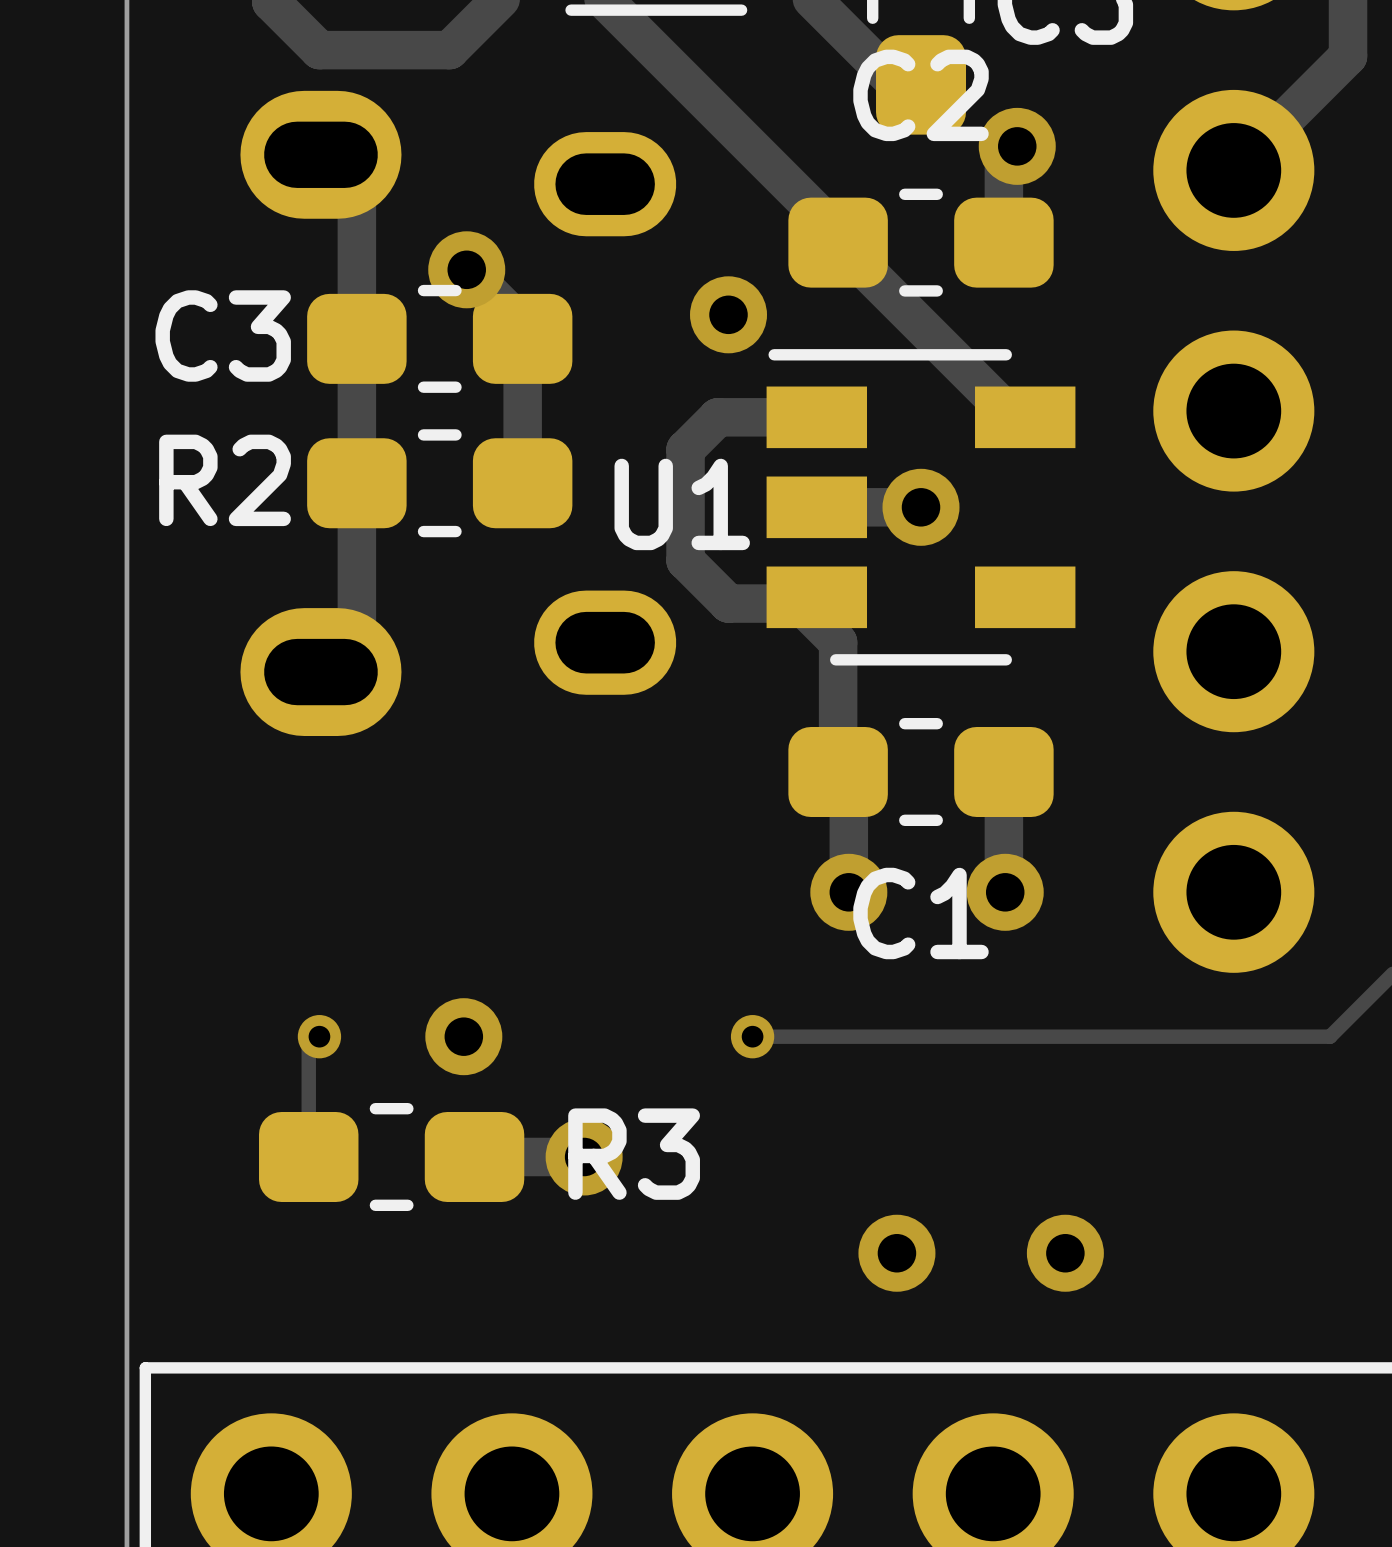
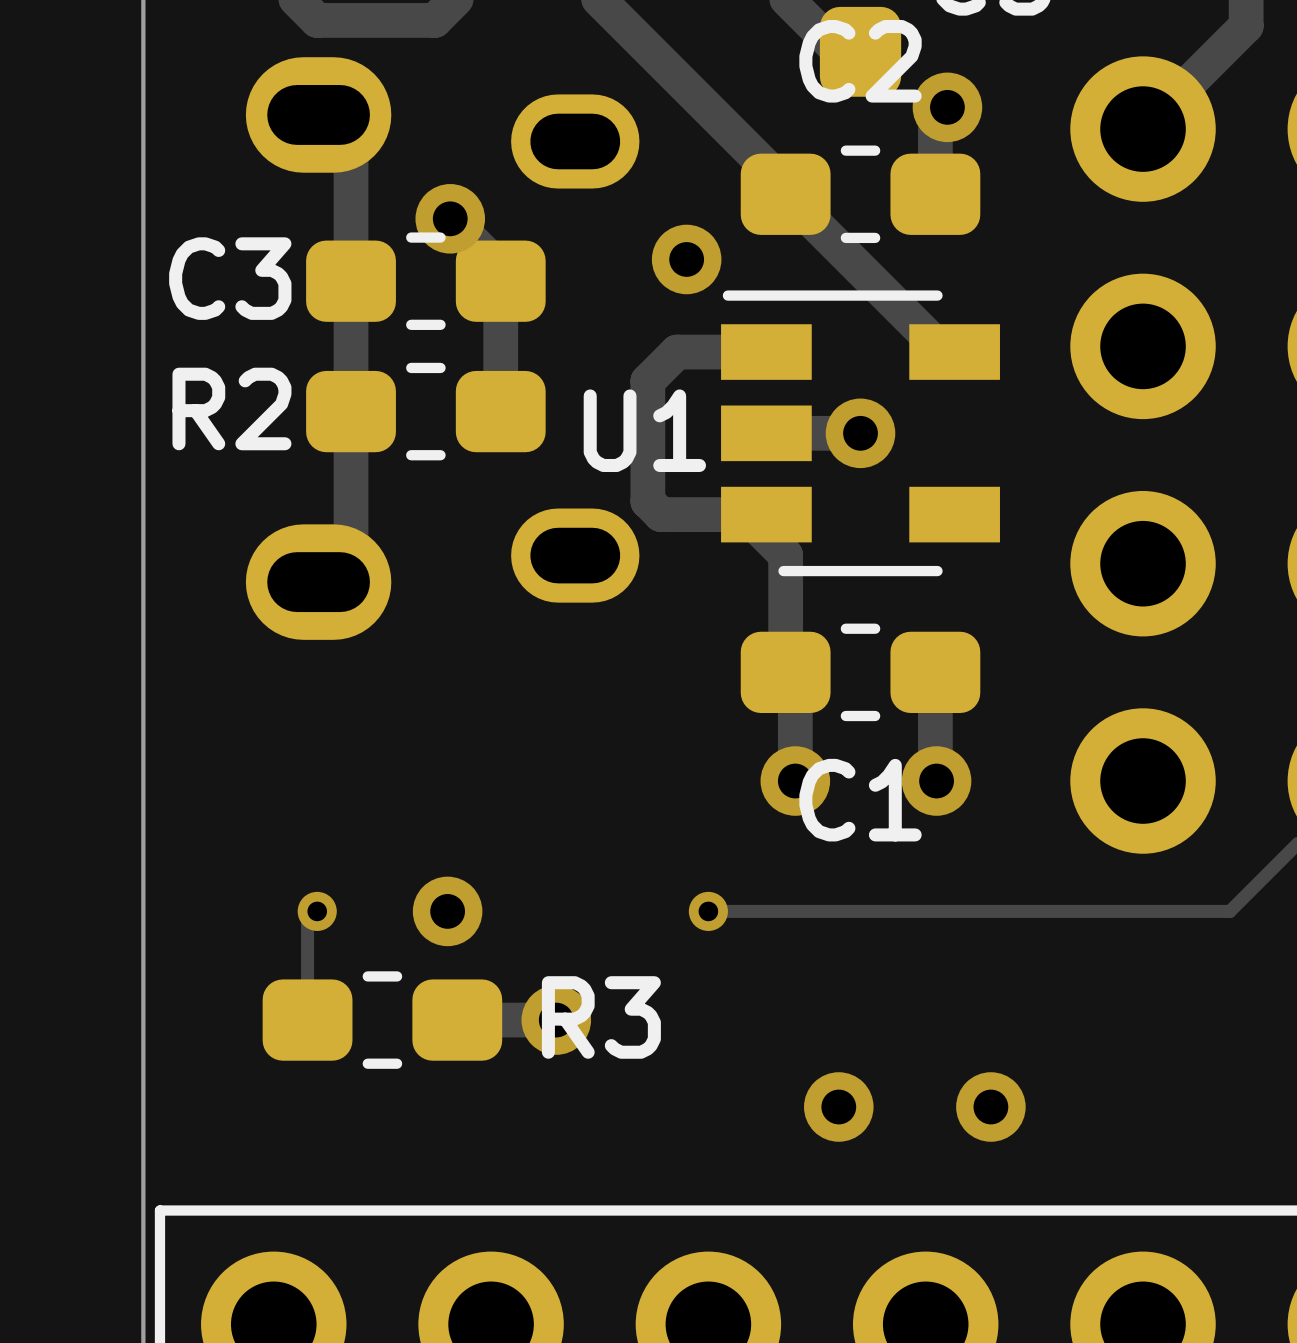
track: (685, 560) (728, 603) (799, 603) -> (647, 481) (647, 501) (660, 514) (745, 514) (750, 520)

